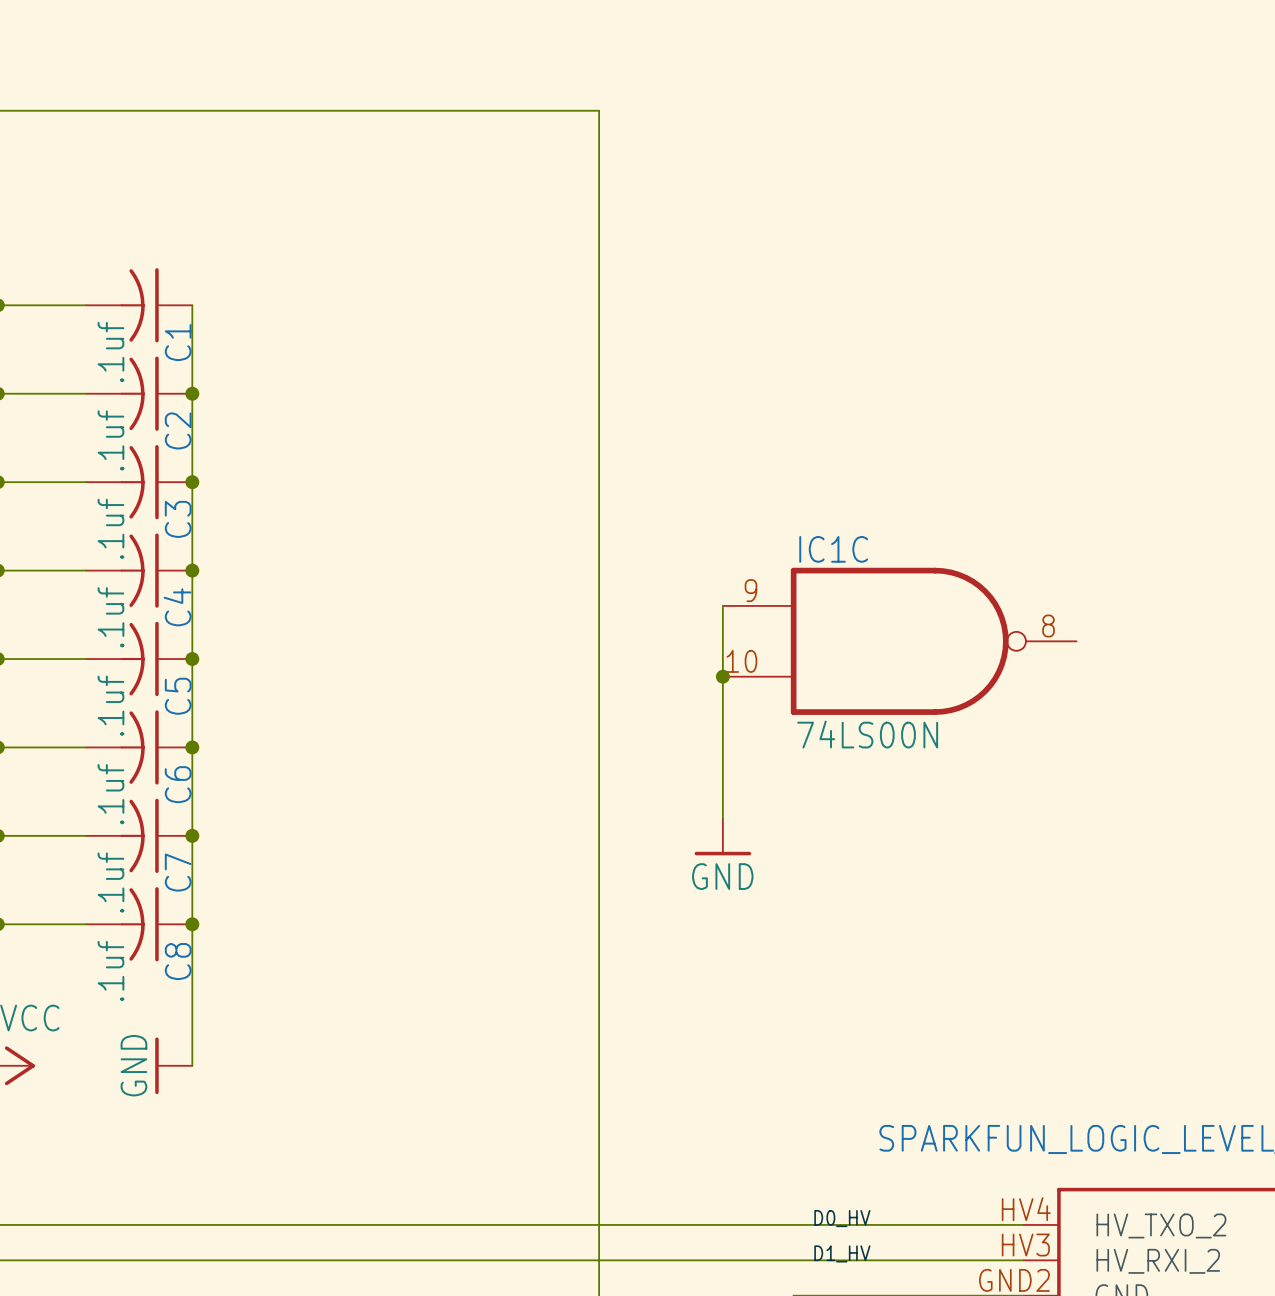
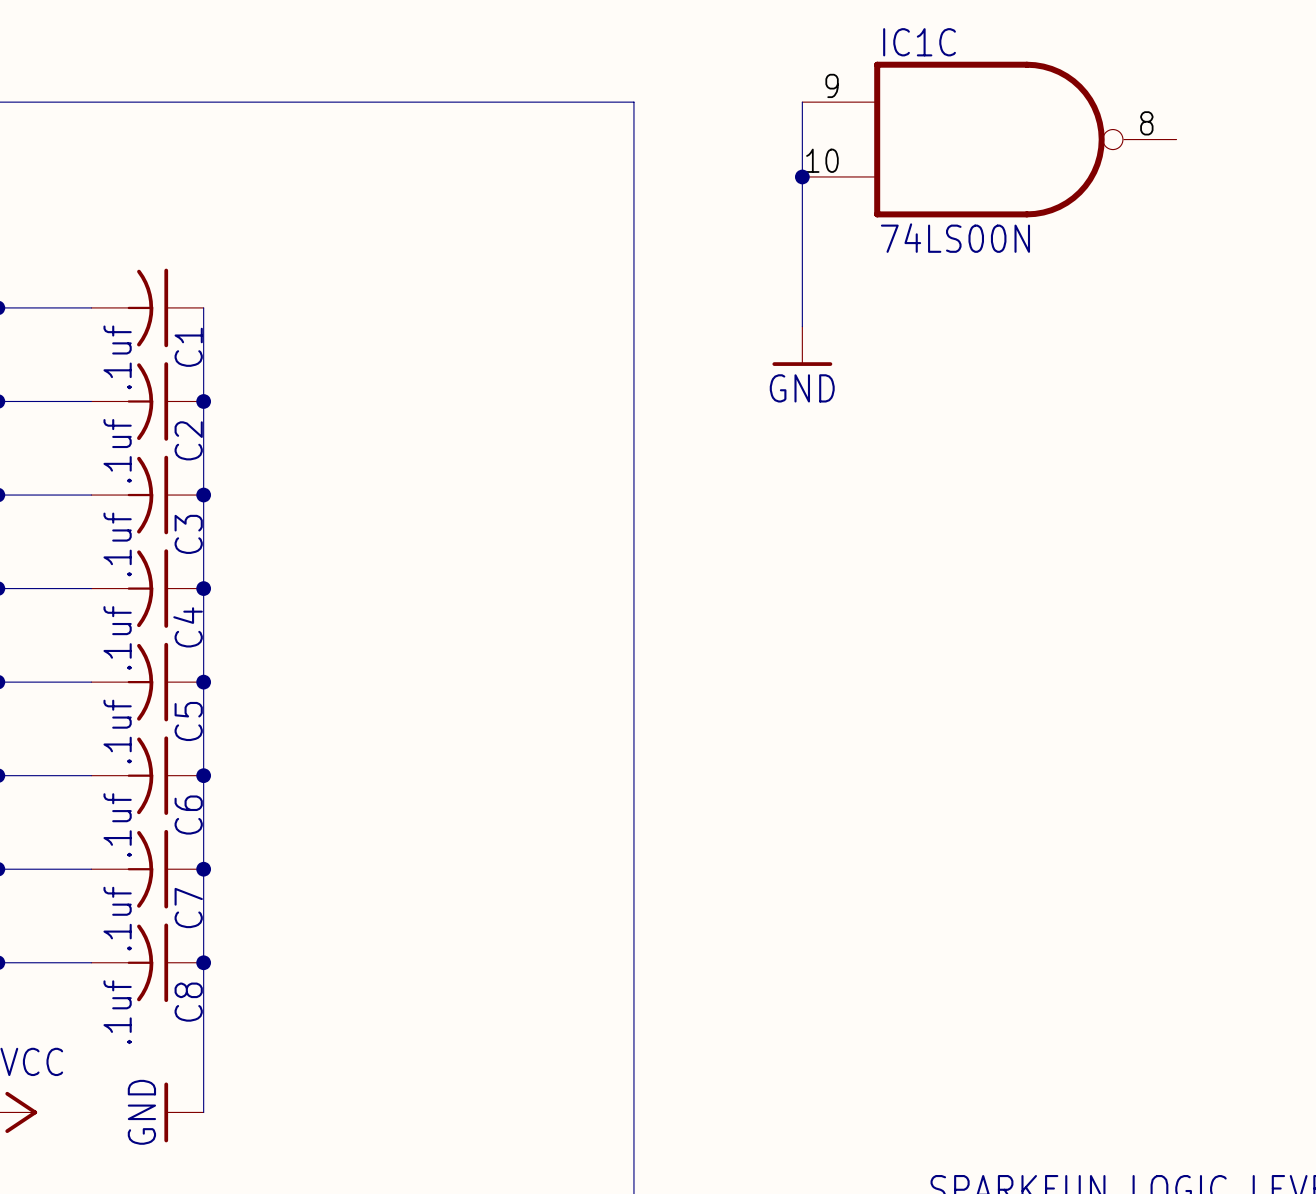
wire: none -> (802, 102) (802, 326)
junction: none -> (802, 176)
power symbol: none -> GND (802, 346)
wire: (722, 605) (722, 818) -> none
IC1C position: (899, 641) -> (989, 139)
junction: (722, 676) -> none
power symbol: GND (722, 836) -> none

